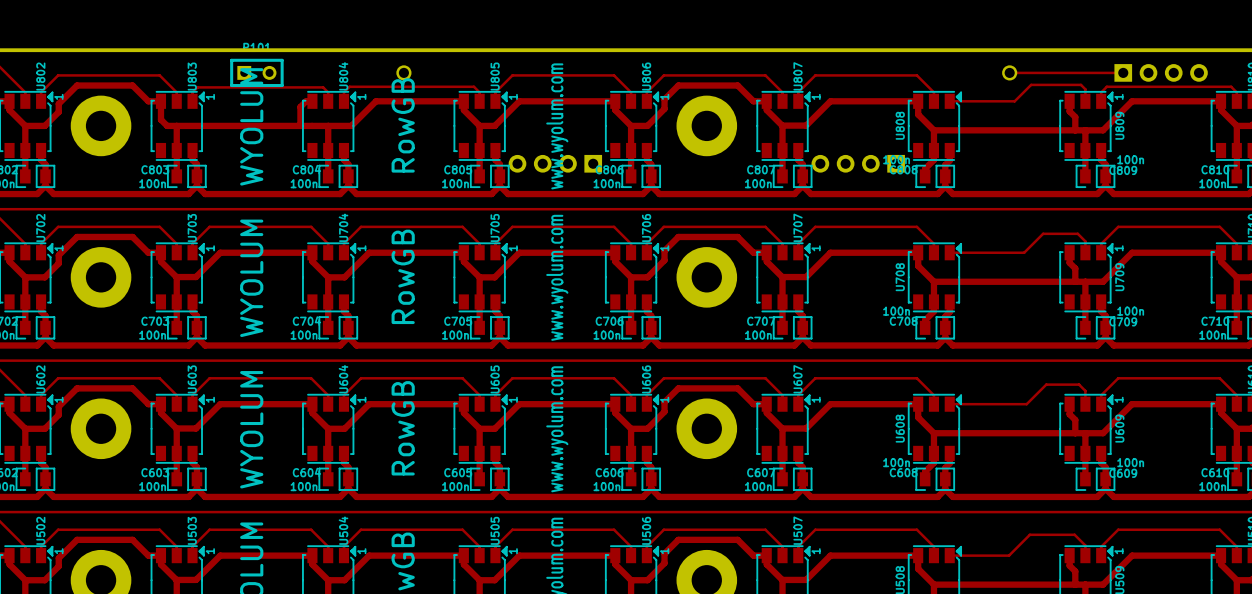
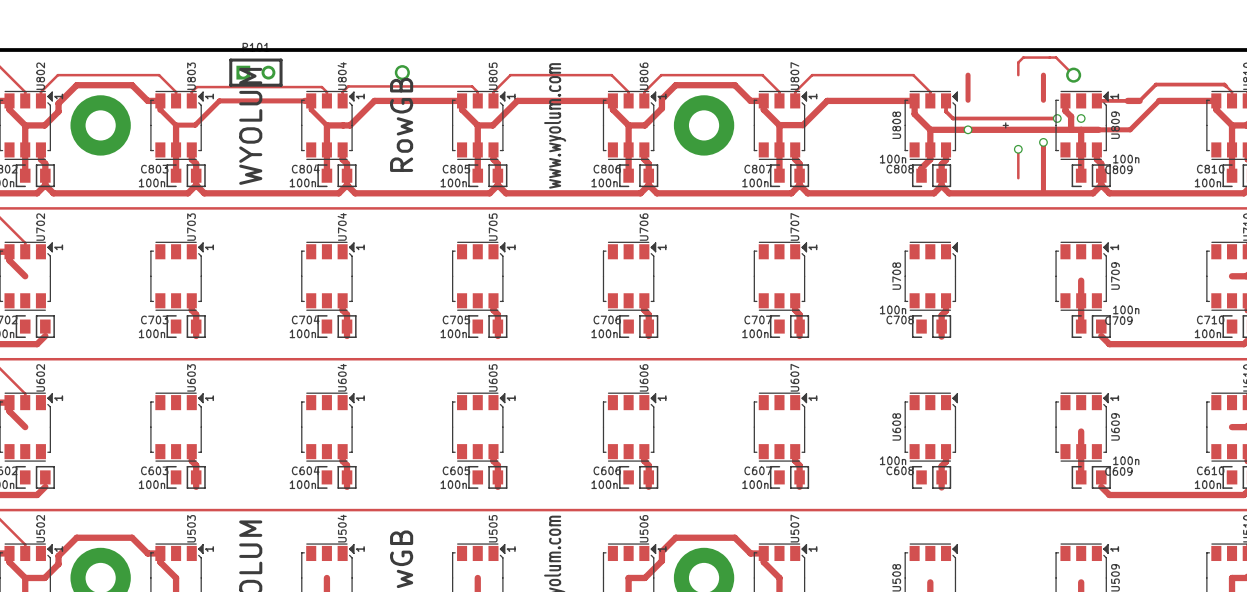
track: (1009, 72) (1123, 72) -> none
part position: (1009, 72) -> (1073, 75)
part: (1161, 72) -> none
track: none -> (968, 75) (968, 100)
track: none -> (1018, 75) (1018, 62) (1023, 57) (1056, 57) (1073, 75)
track: none -> (1043, 75) (1043, 100)
track: (1231, 86) (1106, 86) (1101, 92) (1101, 101) -> (1226, 86) (1224, 84) (1155, 84) (1139, 100)
track: (306, 101) (300, 106) (300, 125) -> (304, 100) (219, 100) (195, 125) (175, 125)
track: none -> (311, 100) (311, 109) (326, 125)
track: (949, 101) (1014, 101) (1031, 84) (1080, 84) (1085, 89) (1085, 101) -> (946, 100) (946, 111) (952, 118) (1057, 118)
track: (1132, 101) (1103, 130) -> (1127, 100) (1096, 100)
track: (1144, 101) (1163, 101) -> (1098, 129) (1130, 129) (1159, 100)
track: (160, 110) (160, 119) (167, 125) (328, 125) -> (160, 109) (176, 125)
via: none -> (1057, 118)
via: none -> (1081, 118)
drawing: none -> [1002, 122, 1009, 129]
via: none -> (968, 129)
track: none -> (1043, 142) (1043, 193)
via: none -> (1043, 142)
track: none -> (1018, 149) (1018, 178)
via: none -> (1018, 149)
part: (555, 163) -> none
part: (858, 163) -> none
track: (41, 252) (41, 243) (58, 226) (159, 226) (176, 243) (176, 252) -> none
track: (192, 252) (192, 243) (209, 226) (311, 226) (328, 243) (328, 252) -> none
track: (343, 252) (343, 243) (361, 226) (462, 226) (479, 243) (479, 252) -> none
track: (495, 252) (495, 243) (512, 226) (614, 226) (631, 243) (631, 252) -> none
track: (646, 252) (646, 243) (663, 226) (765, 226) (782, 243) (782, 252) -> none
track: (798, 252) (798, 243) (815, 226) (916, 226) (933, 243) (933, 252) -> none
track: (949, 252) (1024, 252) (1043, 233) (1077, 233) (1085, 241) (1085, 252) -> none
track: (1069, 252) (1069, 262) (1075, 268) (1075, 281) -> none
track: (1101, 252) (1101, 243) (1118, 226) (1219, 226) (1236, 243) (1236, 252) -> none
text: RowGB (403, 276) -> none
part: (101, 277) -> none
track: (176, 277) (195, 277) (220, 252) (312, 252) (312, 261) (328, 277) -> none
track: (328, 277) (328, 327) -> none
track: (328, 277) (344, 277) (369, 252) (463, 252) (463, 261) (479, 277) -> none
track: (479, 277) (479, 327) -> none
track: (479, 277) (494, 277) (519, 252) (615, 252) (615, 261) (631, 277) -> none
text: www.wyolum.com (557, 277) -> none
track: (631, 277) (631, 327) -> none
track: (631, 277) (647, 277) (664, 260) (664, 250) (678, 236) (737, 236) (753, 252) (766, 252) (766, 261) (782, 277) (782, 327) -> none
part: (706, 277) -> none
track: (782, 277) (806, 277) (830, 252) (918, 252) (918, 265) (933, 281) -> none
text: WYOLUM (251, 278) -> none
track: (933, 281) (933, 311) (925, 320) (925, 327) -> none
track: (933, 281) (1103, 281) (1132, 252) (1221, 252) (1221, 261) (1236, 277) (1236, 327) -> none
track: (41, 301) (41, 311) (45, 315) (45, 337) (53, 345) (188, 345) (196, 337) (205, 345) (340, 345) (348, 337) (356, 345) (491, 345) (499, 337) (508, 345) (643, 345) (651, 337) (659, 345) (794, 345) (802, 337) (810, 345) (937, 345) (945, 337) (952, 345) (1097, 345) (1105, 337) (1105, 315) (1101, 311) (1101, 301) -> none
track: (25, 327) (25, 277) (44, 277) (58, 263) (58, 255) (77, 236) (132, 236) (148, 252) (160, 252) (160, 261) (176, 277) (176, 327) -> none
track: (41, 404) (41, 395) (58, 378) (159, 378) (176, 395) (176, 404) -> none
track: (192, 404) (192, 395) (209, 378) (311, 378) (328, 395) (328, 404) -> none
track: (343, 404) (343, 395) (361, 378) (462, 378) (479, 395) (479, 404) -> none
track: (495, 404) (495, 395) (512, 378) (614, 378) (631, 395) (631, 404) -> none
track: (646, 404) (646, 395) (663, 378) (765, 378) (782, 395) (782, 404) -> none
track: (798, 404) (798, 395) (815, 378) (916, 378) (933, 395) (933, 404) -> none
track: (949, 404) (1026, 404) (1046, 384) (1079, 384) (1085, 390) (1085, 404) -> none
track: (1069, 404) (1069, 414) (1075, 419) (1075, 433) -> none
track: (1101, 404) (1101, 395) (1118, 378) (1219, 378) (1236, 395) (1236, 404) -> none
part: (101, 428) -> none
track: (176, 428) (195, 428) (220, 404) (312, 404) (312, 413) (328, 428) -> none
track: (328, 428) (328, 479) -> none
track: (328, 428) (344, 428) (369, 404) (463, 404) (463, 413) (479, 428) -> none
text: RowGB (403, 428) -> none
track: (479, 428) (479, 479) -> none
track: (479, 428) (494, 428) (519, 404) (615, 404) (615, 413) (631, 428) -> none
track: (631, 428) (631, 479) -> none
track: (631, 428) (647, 428) (664, 411) (664, 402) (678, 388) (737, 388) (753, 404) (766, 404) (766, 413) (782, 428) (782, 479) -> none
part: (706, 428) -> none
track: (782, 428) (806, 428) (830, 404) (918, 404) (918, 417) (933, 433) -> none
text: WYOLUM (251, 429) -> none
text: www.wyolum.com (557, 429) -> none
track: (933, 433) (933, 462) (925, 471) (925, 479) -> none
track: (933, 433) (1103, 433) (1132, 404) (1221, 404) (1221, 413) (1236, 428) (1236, 479) -> none
track: (41, 453) (41, 462) (45, 467) (45, 488) (53, 496) (188, 496) (196, 488) (205, 496) (340, 496) (348, 488) (356, 496) (491, 496) (499, 488) (508, 496) (643, 496) (651, 488) (659, 496) (794, 496) (802, 488) (810, 496) (937, 496) (945, 489) (952, 496) (1097, 496) (1105, 488) (1105, 467) (1101, 462) (1101, 453) -> none
track: (25, 479) (25, 428) (44, 428) (58, 414) (58, 406) (77, 388) (132, 388) (148, 404) (160, 404) (160, 413) (176, 428) (176, 479) -> none
track: (41, 555) (41, 546) (58, 529) (159, 529) (176, 546) (176, 555) -> none
track: (192, 555) (192, 546) (209, 529) (311, 529) (328, 546) (328, 555) -> none
track: (343, 555) (343, 546) (361, 529) (462, 529) (479, 546) (479, 555) -> none
track: (495, 555) (495, 546) (512, 529) (614, 529) (631, 546) (631, 555) -> none
track: (646, 555) (646, 546) (663, 529) (765, 529) (782, 546) (782, 555) -> none
track: (798, 555) (798, 546) (815, 529) (916, 529) (933, 546) (933, 555) -> none
track: (949, 555) (1009, 555) (1029, 534) (1074, 534) (1085, 545) (1085, 555) -> none
track: (1069, 555) (1069, 565) (1075, 571) (1075, 584) -> none
track: (1101, 555) (1101, 546) (1118, 529) (1219, 529) (1236, 546) (1236, 555) -> none
track: (176, 579) (195, 579) (220, 555) (312, 555) (312, 564) (328, 580) (344, 580) (369, 555) (463, 555) (463, 564) (479, 580) (494, 580) (519, 555) (615, 555) (615, 564) (631, 580) -> none
track: (782, 579) (806, 579) (830, 555) (918, 555) (918, 568) (933, 584) (1103, 584) (1132, 555) (1221, 555) (1221, 564) (1236, 580) -> none

